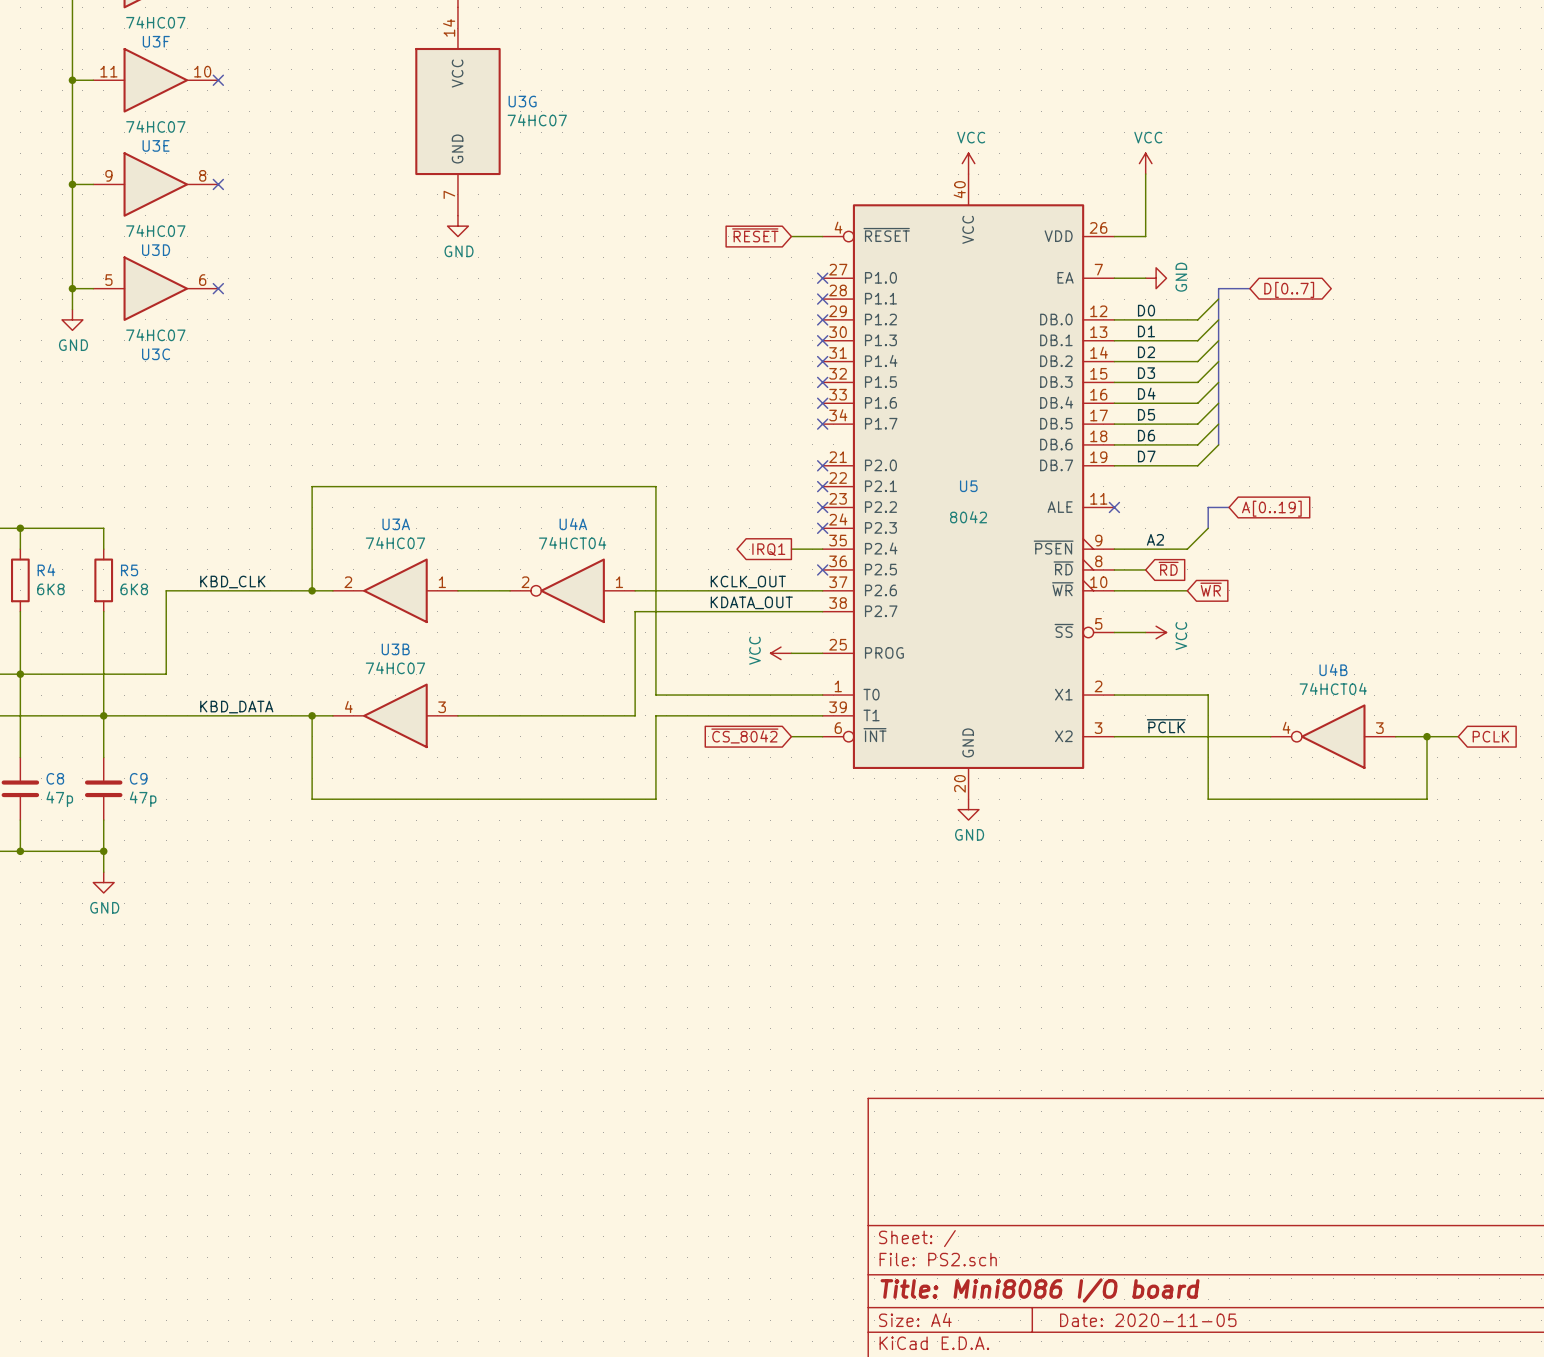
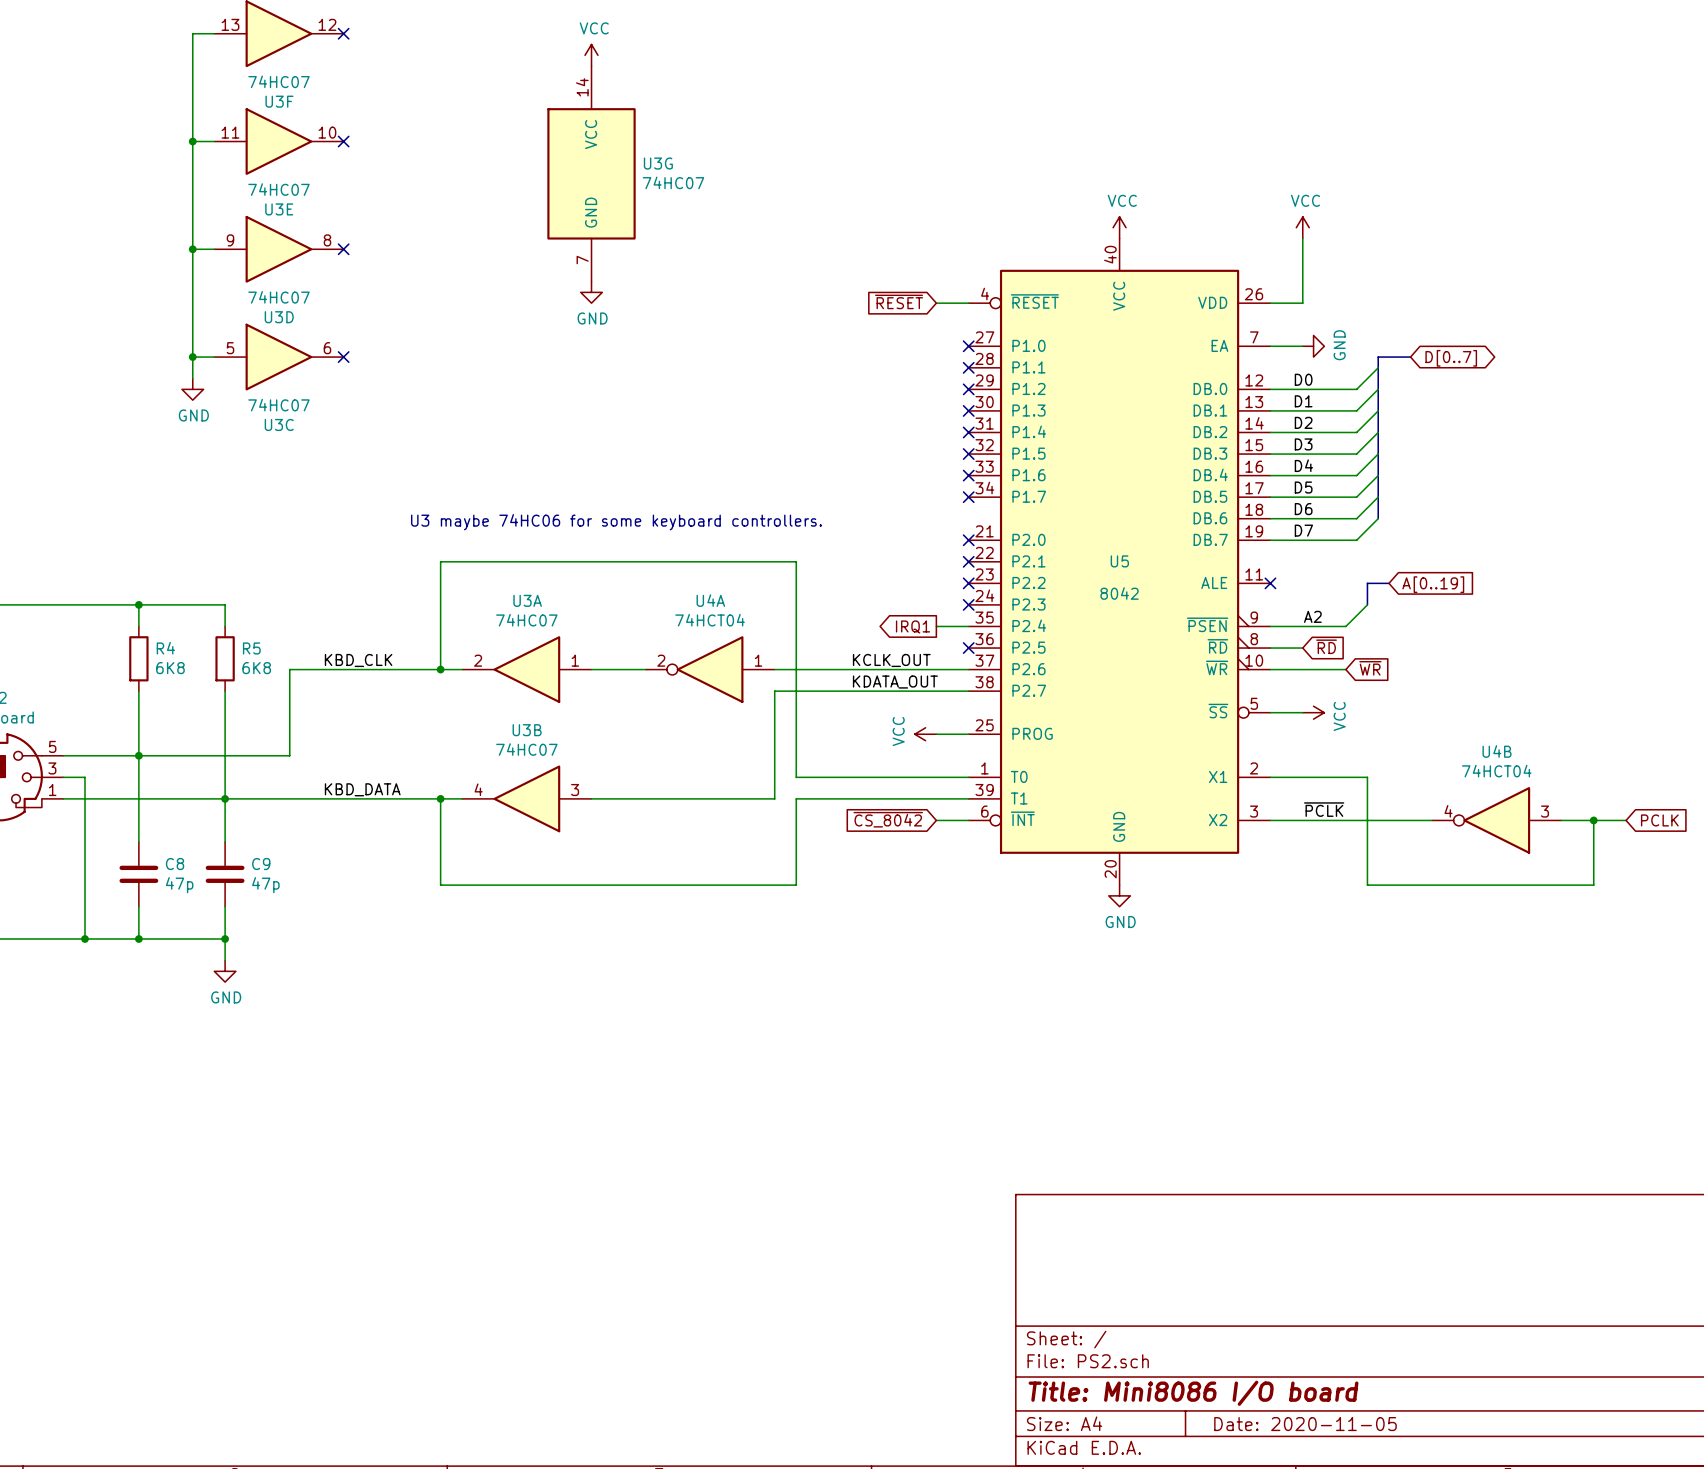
text: none -> U3 maybe 74HC06 for some keyboard controllers. (616, 522)

